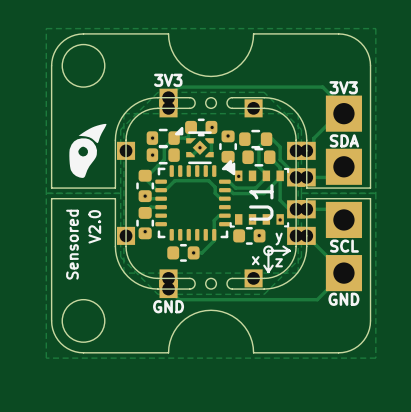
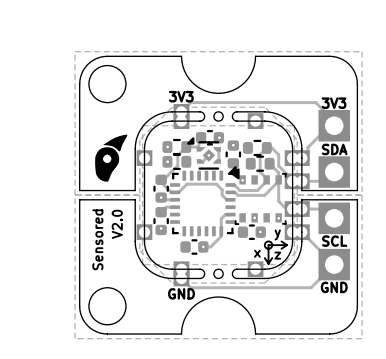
U1 name: U1 (261, 202) -> none

